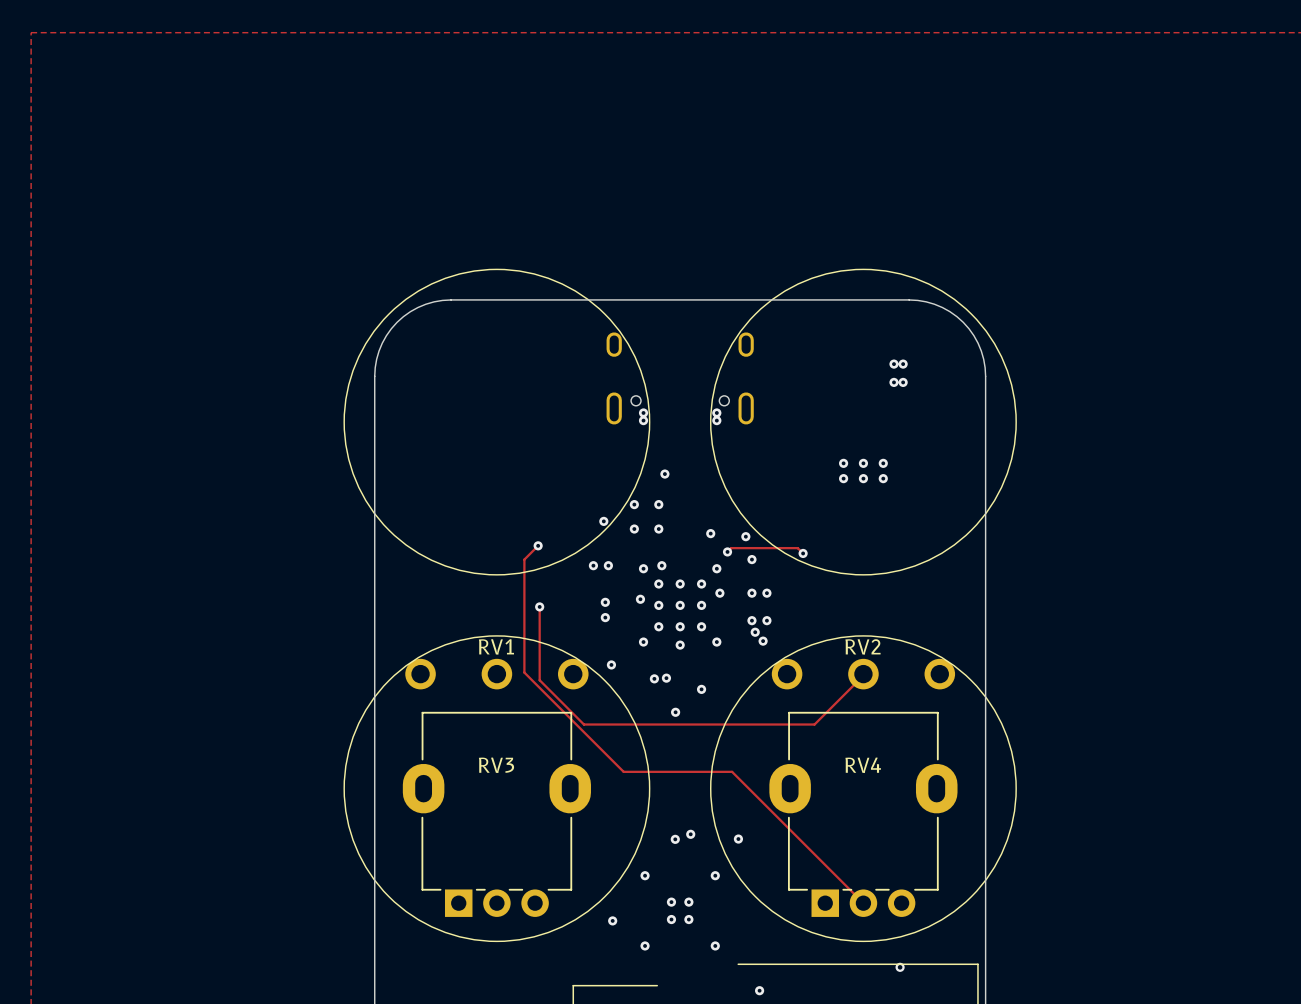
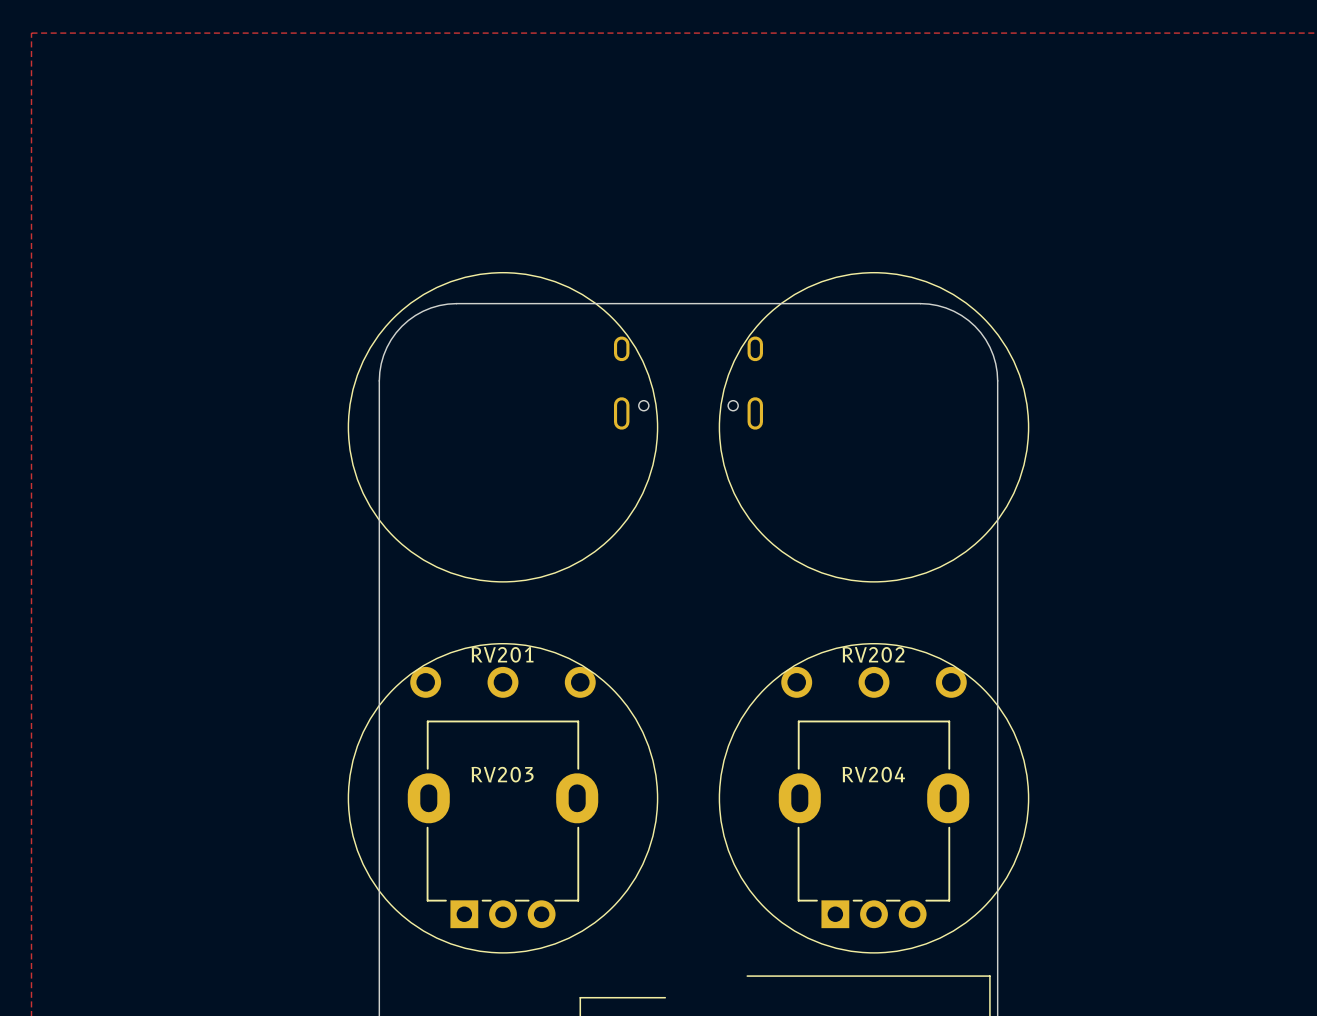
via: (893, 364) -> none
via: (903, 364) -> none
via: (893, 382) -> none
via: (903, 382) -> none
via: (643, 412) -> none
via: (716, 412) -> none
via: (643, 420) -> none
via: (716, 420) -> none
via: (843, 463) -> none
via: (863, 463) -> none
via: (883, 463) -> none
via: (664, 474) -> none
via: (843, 478) -> none
via: (863, 478) -> none
via: (883, 478) -> none
via: (634, 504) -> none
via: (658, 504) -> none
via: (603, 521) -> none
via: (634, 529) -> none
via: (658, 529) -> none
via: (710, 533) -> none
via: (745, 536) -> none
track: (538, 545) (524, 559) (524, 672) (623, 771) (732, 771) (863, 903) -> none
via: (538, 545) -> none
track: (727, 551) (731, 548) (797, 548) (803, 553) -> none
via: (727, 551) -> none
via: (803, 553) -> none
via: (751, 559) -> none
via: (593, 565) -> none
via: (608, 565) -> none
via: (661, 565) -> none
via: (643, 568) -> none
via: (716, 568) -> none
via: (658, 584) -> none
via: (680, 584) -> none
via: (701, 584) -> none
via: (719, 593) -> none
via: (751, 593) -> none
via: (766, 593) -> none
via: (640, 599) -> none
via: (605, 602) -> none
via: (658, 605) -> none
via: (680, 605) -> none
via: (701, 605) -> none
track: (539, 606) (539, 680) (583, 724) (814, 724) (863, 674) -> none
via: (539, 606) -> none
via: (605, 617) -> none
via: (751, 620) -> none
via: (766, 620) -> none
via: (658, 626) -> none
via: (680, 626) -> none
via: (701, 626) -> none
via: (755, 632) -> none
via: (763, 641) -> none
via: (643, 642) -> none
via: (716, 642) -> none
via: (680, 645) -> none
RV1 name: RV1 (496, 646) -> RV201 (502, 654)
RV2 name: RV2 (862, 646) -> RV202 (873, 654)
via: (611, 664) -> none
via: (654, 678) -> none
via: (666, 678) -> none
via: (701, 689) -> none
via: (675, 712) -> none
RV3 name: RV3 (496, 765) -> RV203 (502, 774)
RV4 name: RV4 (863, 765) -> RV204 (873, 774)
via: (690, 834) -> none
via: (675, 839) -> none
via: (738, 839) -> none
via: (645, 875) -> none
via: (715, 875) -> none
via: (671, 902) -> none
via: (688, 902) -> none
via: (671, 919) -> none
via: (688, 919) -> none
via: (612, 920) -> none
via: (645, 945) -> none
via: (715, 945) -> none
via: (900, 967) -> none
via: (759, 990) -> none

